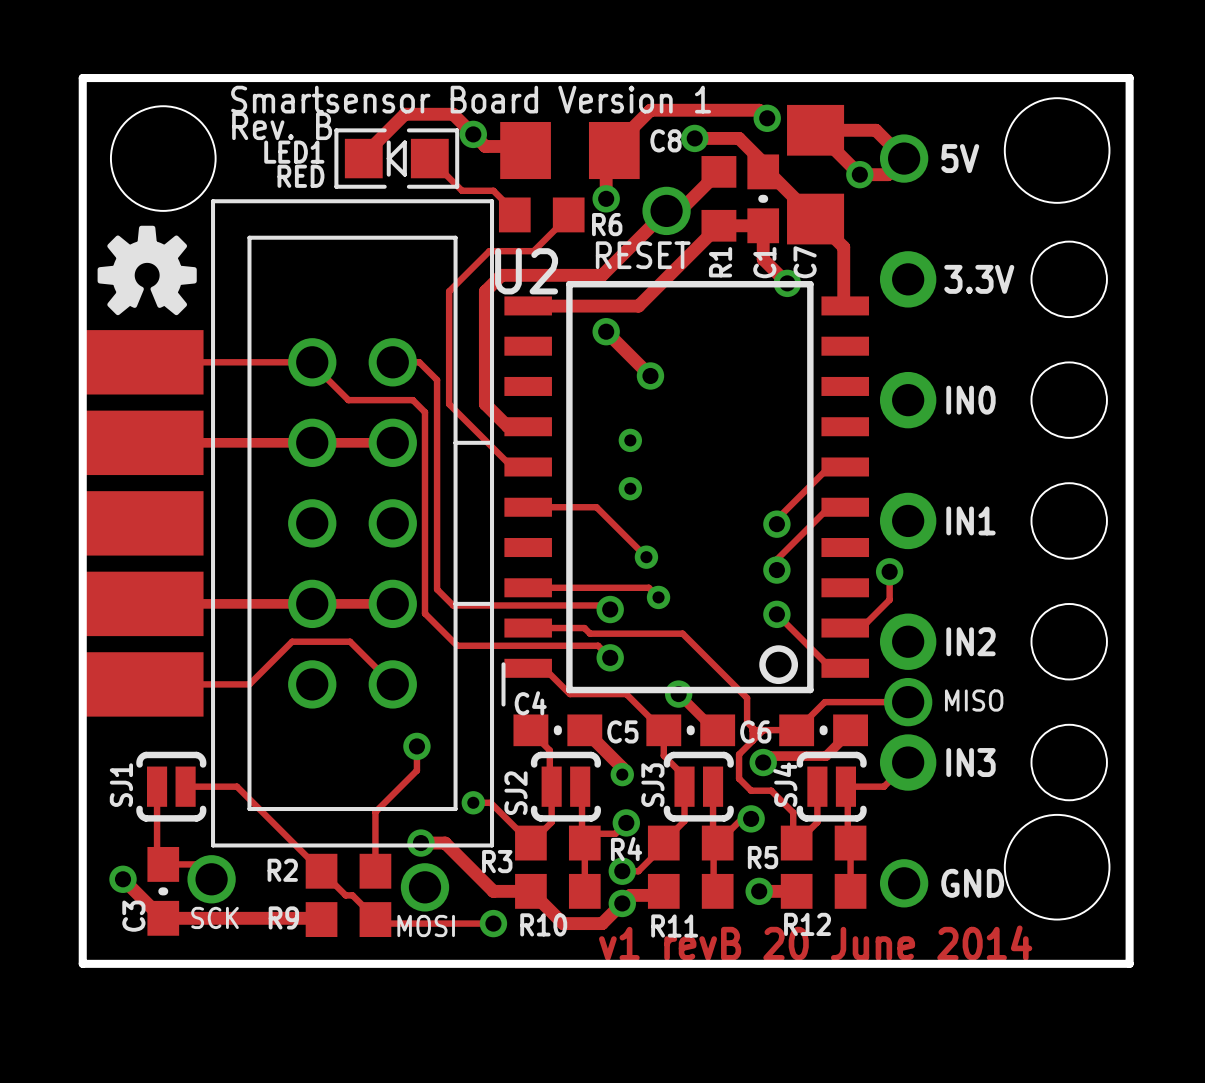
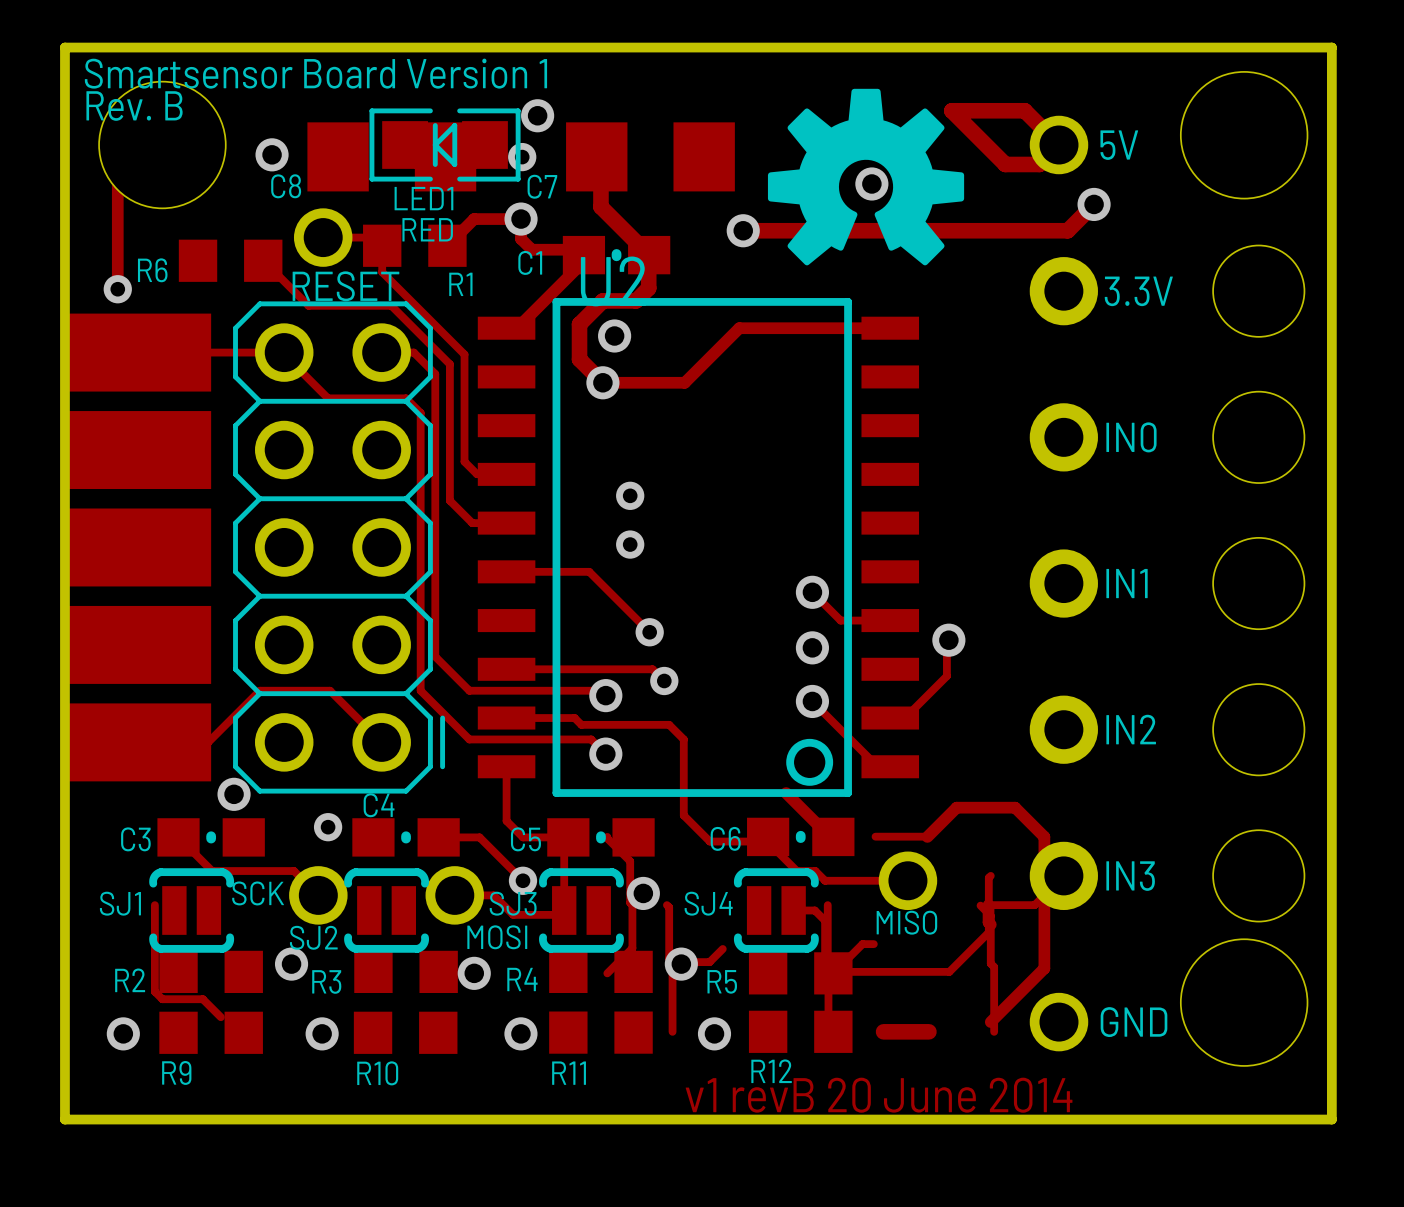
text position: Smartsensor Board Version 1 (471, 99) -> Smartsensor Board Version 1 (315, 73)
drawing: none -> [767, 88, 965, 266]
track: (767, 118) (759, 110) (650, 110) (614, 146) (614, 150) (606, 158) (606, 198) -> none
via: (767, 118) -> none
text position: Rev. B (282, 126) -> Rev. B (134, 106)
track: (694, 138) (739, 138) (763, 162) (763, 171) (768, 171) (843, 247) (845, 305) -> none
via: (694, 138) -> none
C8 name position: C8 (665, 140) -> C8 (286, 186)
track: (525, 150) (521, 146) (485, 146) (453, 114) (404, 114) (363, 155) (363, 158) -> none
C8 position: (569, 150) -> (391, 156)
LED1 name position: LED1 (294, 152) -> LED1 (423, 198)
track: (429, 158) (462, 190) (493, 190) (514, 212) (514, 214) -> none
via: none -> (272, 154)
via: none -> (522, 157)
track: none -> (596, 156) (600, 156) (600, 206) (649, 255)
track: none -> (117, 159) (117, 289)
track: (718, 171) (679, 210) (666, 210) (602, 275) (501, 275) (485, 291) (485, 404) (507, 426) (513, 426) -> none
C7 rotation: 0° (815, 174) -> 90° clockwise (650, 156)
C7 position: (815, 174) -> (650, 156)
via: (859, 174) -> none
LED1 value position: RED (300, 176) -> RED (427, 229)
via: none -> (871, 183)
via position: (606, 198) -> (743, 230)
R1 rotation: 0° (718, 198) -> 90° clockwise (414, 245)
R1 position: (718, 198) -> (414, 245)
C1 rotation: 0° (763, 198) -> 90° clockwise (616, 255)
C1 position: (763, 198) -> (616, 255)
track: none -> (1094, 204) (1067, 230) (743, 230)
via: none -> (1094, 204)
RESET position: (666, 210) -> (323, 237)
R6 position: (541, 214) -> (230, 260)
track: (568, 214) (533, 251) (489, 251) (449, 291) (449, 404) (509, 464) (525, 464) (528, 466) -> none
via: none -> (521, 219)
R6 name position: R6 (607, 224) -> R6 (152, 270)
drawing: [97, 225, 197, 316] -> none
track: none -> (323, 237) (374, 237) (382, 245) (382, 272) (464, 354) (464, 461) (476, 474) (488, 474)
track: none -> (447, 245) (474, 219) (521, 219) (521, 238) (531, 249) (583, 249) (584, 261) (516, 328) (506, 328)
track: none -> (648, 255) (648, 288) (636, 300) (602, 300) (579, 324) (579, 359) (602, 382) (684, 382) (739, 328) (890, 328)
track: none -> (263, 260) (308, 305) (391, 305) (449, 364) (449, 500) (472, 523) (506, 523)
RESET name position: RESET (643, 255) -> RESET (345, 286)
via: none -> (117, 289)
track: (787, 283) (763, 259) (763, 225) (718, 225) (638, 306) (528, 306) -> none
via: (787, 283) -> none
via: none -> (614, 336)
track: none -> (138, 352) (284, 352) (328, 398) (406, 398) (420, 412) (420, 690) (469, 739) (591, 739) (605, 754)
track: none -> (381, 352) (413, 352) (435, 374) (435, 656) (469, 690) (600, 690) (605, 695)
track: (606, 331) (650, 375) -> none
via: (606, 331) -> none
via: none -> (602, 382)
track: (143, 362) (312, 362) (348, 400) (412, 400) (424, 412) (424, 613) (457, 645) (598, 645) (610, 657) -> none
track: (392, 362) (419, 362) (437, 380) (437, 589) (453, 605) (606, 605) (610, 609) -> none
via: (650, 375) -> none
via: (630, 440) -> none
track: (143, 442) (392, 442) -> none
via: none -> (630, 495)
track: (845, 466) (827, 468) (776, 519) (776, 524) -> none
U2 position: (686, 487) -> (698, 547)
via: none -> (630, 544)
via: (630, 488) -> none
part: none -> (339, 547)
track: (528, 507) (596, 507) (646, 557) -> (506, 571) (589, 571) (649, 632)
track: (845, 507) (827, 508) (776, 559) (776, 570) -> none
part position: (143, 523) -> (138, 547)
part: (358, 523) -> none
via: (776, 524) -> none
track: none -> (812, 592) (840, 620) (890, 620)
via: none -> (812, 592)
via: (646, 557) -> none
via: none -> (649, 632)
track: none -> (948, 640) (946, 642) (946, 676) (910, 712) (910, 718) (890, 718)
via: none -> (948, 640)
via: (776, 570) -> none
track: (889, 571) (889, 599) (866, 623) (862, 623) (862, 628) (845, 628) -> none
via: (889, 571) -> none
via: none -> (812, 647)
track: (528, 587) (648, 587) (658, 597) -> (506, 669) (652, 669) (664, 680)
via: (658, 597) -> none
via: none -> (664, 680)
track: (143, 603) (392, 603) -> none
via: (610, 609) -> none
via: none -> (605, 695)
track: (776, 614) (830, 668) (845, 668) -> none
via: (776, 614) -> none
track: none -> (812, 701) (877, 766) (890, 766)
via: none -> (812, 701)
track: (515, 628) (584, 628) (590, 633) (682, 633) (747, 698) (747, 722) (752, 727) (752, 740) -> none
track: none -> (490, 718) (574, 718) (581, 724) (669, 724) (683, 739) (683, 815) (709, 841) (759, 841) (763, 837) (796, 871) (815, 871) (825, 880) (907, 880)
track: none -> (138, 742) (208, 742) (259, 690) (330, 690) (381, 742)
via: (610, 657) -> none
via: none -> (605, 754)
track: (524, 664) (529, 669) (545, 669) (569, 694) (626, 694) (663, 730) (663, 755) (678, 770) (678, 780) (684, 786) (684, 821) (663, 843) (663, 845) (638, 871) (622, 871) -> none
track: none -> (506, 766) (506, 820) (522, 837) (568, 837) (564, 841) (564, 910) (559, 914) (513, 914) (493, 895) (454, 895)
track: (143, 684) (249, 684) (292, 641) (350, 641) (392, 684) -> none
via: (678, 694) -> none
via: none -> (234, 794)
MISO name position: MISO (974, 700) -> MISO (906, 922)
track: (908, 702) (824, 702) (796, 730) -> (990, 1022) (1044, 968) (1044, 836) (1015, 807) (956, 807) (927, 836)
MISO position: (908, 702) -> (907, 880)
via: none -> (328, 827)
track: none -> (177, 835) (212, 871) (293, 871) (318, 895)
track: none -> (438, 837) (479, 837) (522, 880)
C5: none -> (600, 837)
C4 position: (557, 730) -> (406, 837)
track: (584, 730) (622, 767) (622, 774) -> none
track: (763, 730) (739, 754) (739, 778) (751, 790) (771, 790) (793, 812) (793, 834) (796, 837) (796, 843) (817, 822) (817, 786) -> none
C6: (823, 730) -> none
track: (850, 730) (847, 730) (847, 734) (826, 756) (769, 756) (763, 762) -> none
C5 name: C5 (622, 731) -> C6 (725, 838)
track: (416, 746) (416, 770) (375, 812) (375, 871) -> none
via: (416, 746) -> none
via: (763, 762) -> none
track: none -> (990, 875) (988, 877) (988, 932) (949, 971) (828, 971) (825, 968) (825, 920) (814, 910) (793, 910)
via: (622, 774) -> none
via: none -> (643, 893)
SJ4 name rotation: 0° (785, 784) -> 90° clockwise (708, 903)
SJ1 name rotation: 0° (121, 785) -> 90° clockwise (120, 903)
SJ3 name rotation: 0° (652, 785) -> 90° clockwise (513, 903)
SJ1 position: (171, 786) -> (191, 910)
track: (185, 786) (236, 786) (345, 895) (352, 895) (379, 923) (493, 923) -> none
SJ2 position: (565, 786) -> (386, 910)
SJ3 position: (698, 786) -> (581, 910)
SJ4 position: (831, 786) -> (776, 910)
SJ2 name rotation: 0° (515, 793) -> 90° clockwise (313, 937)
track: (473, 802) (490, 802) (530, 843) (523, 840) (523, 834) -> none
via position: (473, 802) -> (522, 880)
via: (751, 818) -> none
via: (626, 822) -> none
via: none -> (291, 964)
via: none -> (681, 964)
R4: none -> (600, 971)
track: (420, 843) (445, 843) (493, 891) (530, 891) (563, 923) (602, 923) (630, 895) (658, 895) (663, 891) -> none
R3 position: (557, 843) -> (406, 971)
R5: (823, 843) -> none
R4 name: R4 (626, 849) -> R5 (722, 981)
R3 name position: R3 (497, 861) -> R3 (326, 981)
R2 name position: R2 (282, 870) -> R2 (130, 980)
R2 position: (348, 871) -> (211, 971)
via: (622, 871) -> none
track: (123, 879) (162, 918) (321, 919) -> none
via position: (123, 879) -> (123, 1033)
SCK position: (211, 879) -> (318, 895)
MOSI position: (424, 887) -> (454, 895)
C3 rotation: 0° (163, 891) -> 90° clockwise (211, 837)
C3 position: (163, 891) -> (211, 837)
R10 position: (557, 891) -> (405, 1032)
via: (759, 891) -> none
R12: (823, 891) -> none
R11: none -> (600, 1032)
via: none -> (322, 1033)
via: none -> (714, 1033)
via: (622, 903) -> none
SCK name position: SCK (215, 917) -> SCK (258, 893)
R9 name position: R9 (283, 917) -> R9 (176, 1072)
R9 position: (348, 919) -> (211, 1032)
via position: (493, 923) -> (520, 1033)
MOSI name position: MOSI (426, 926) -> MOSI (497, 937)
R11 name: R11 (674, 926) -> R12 (771, 1071)

